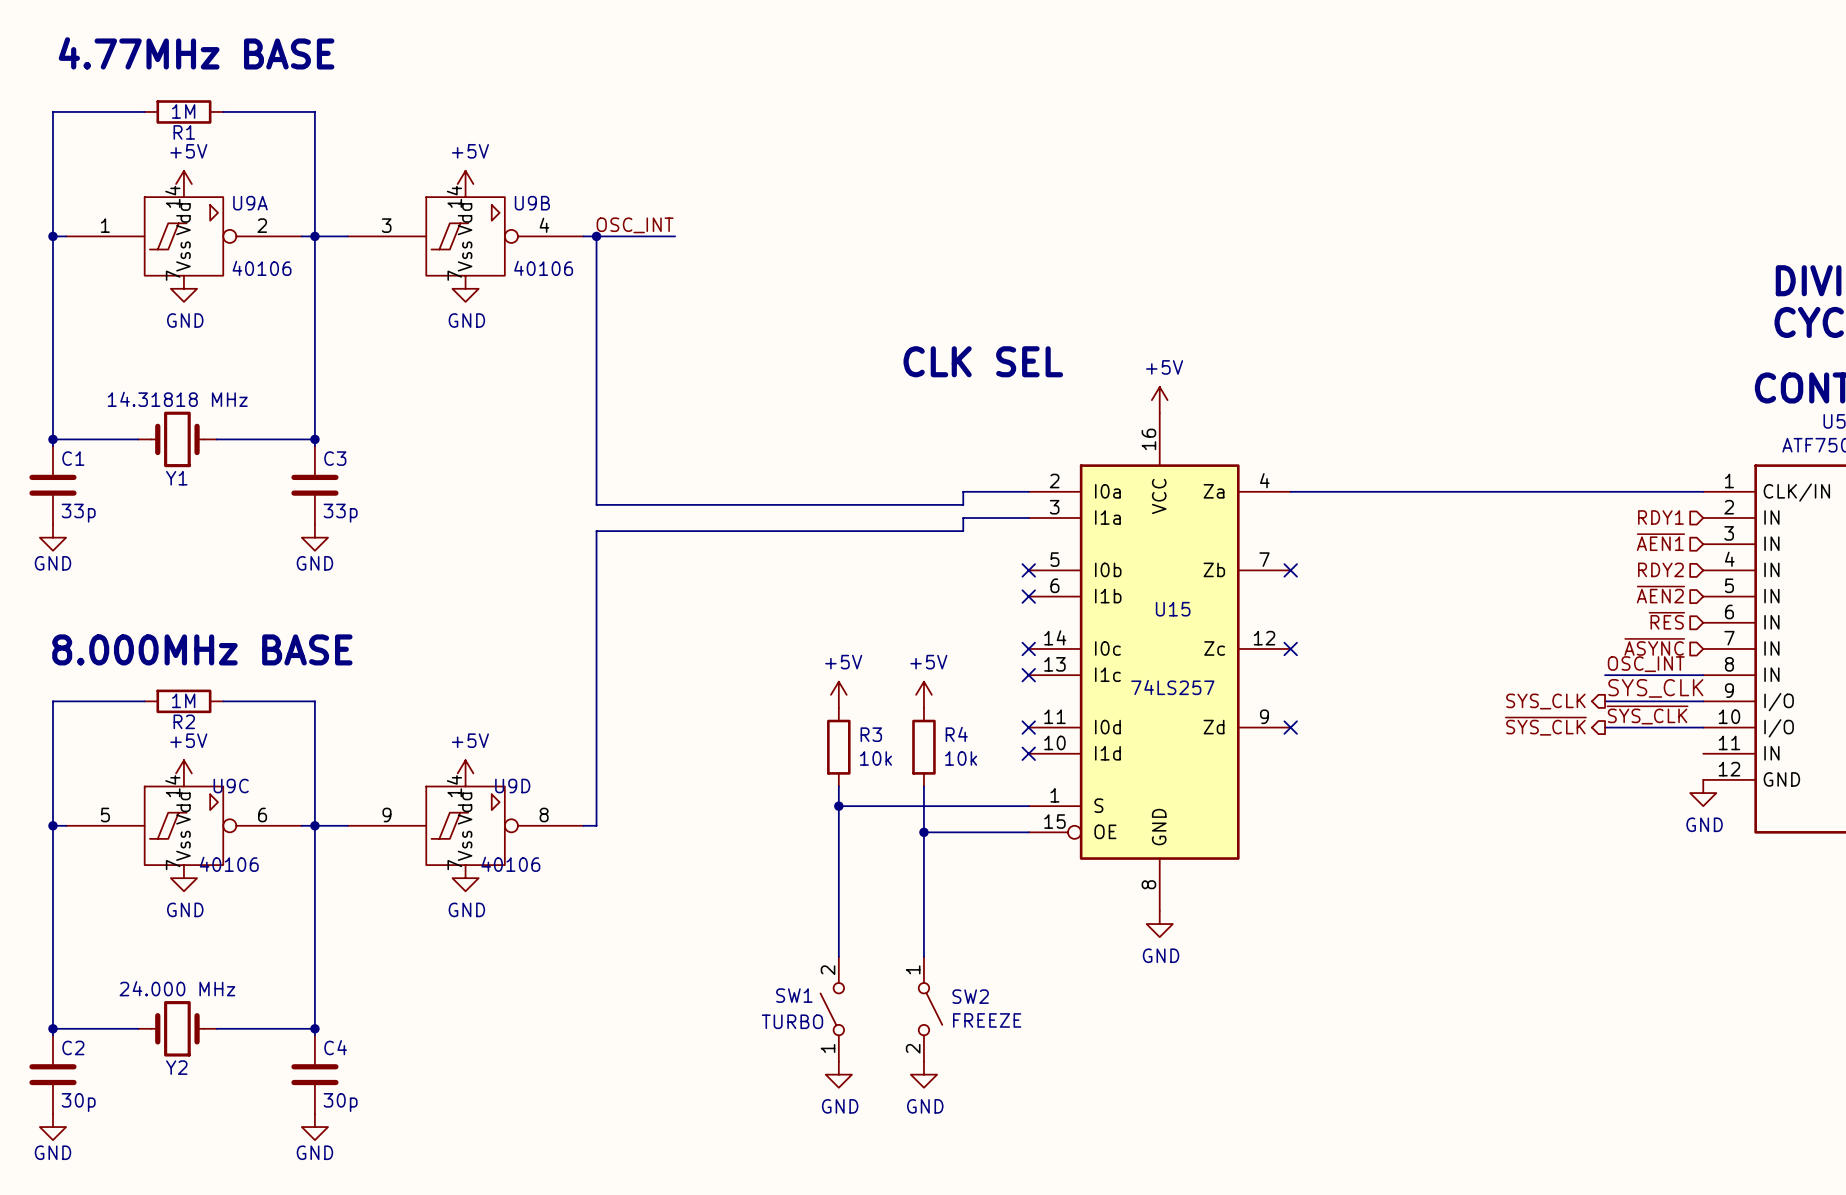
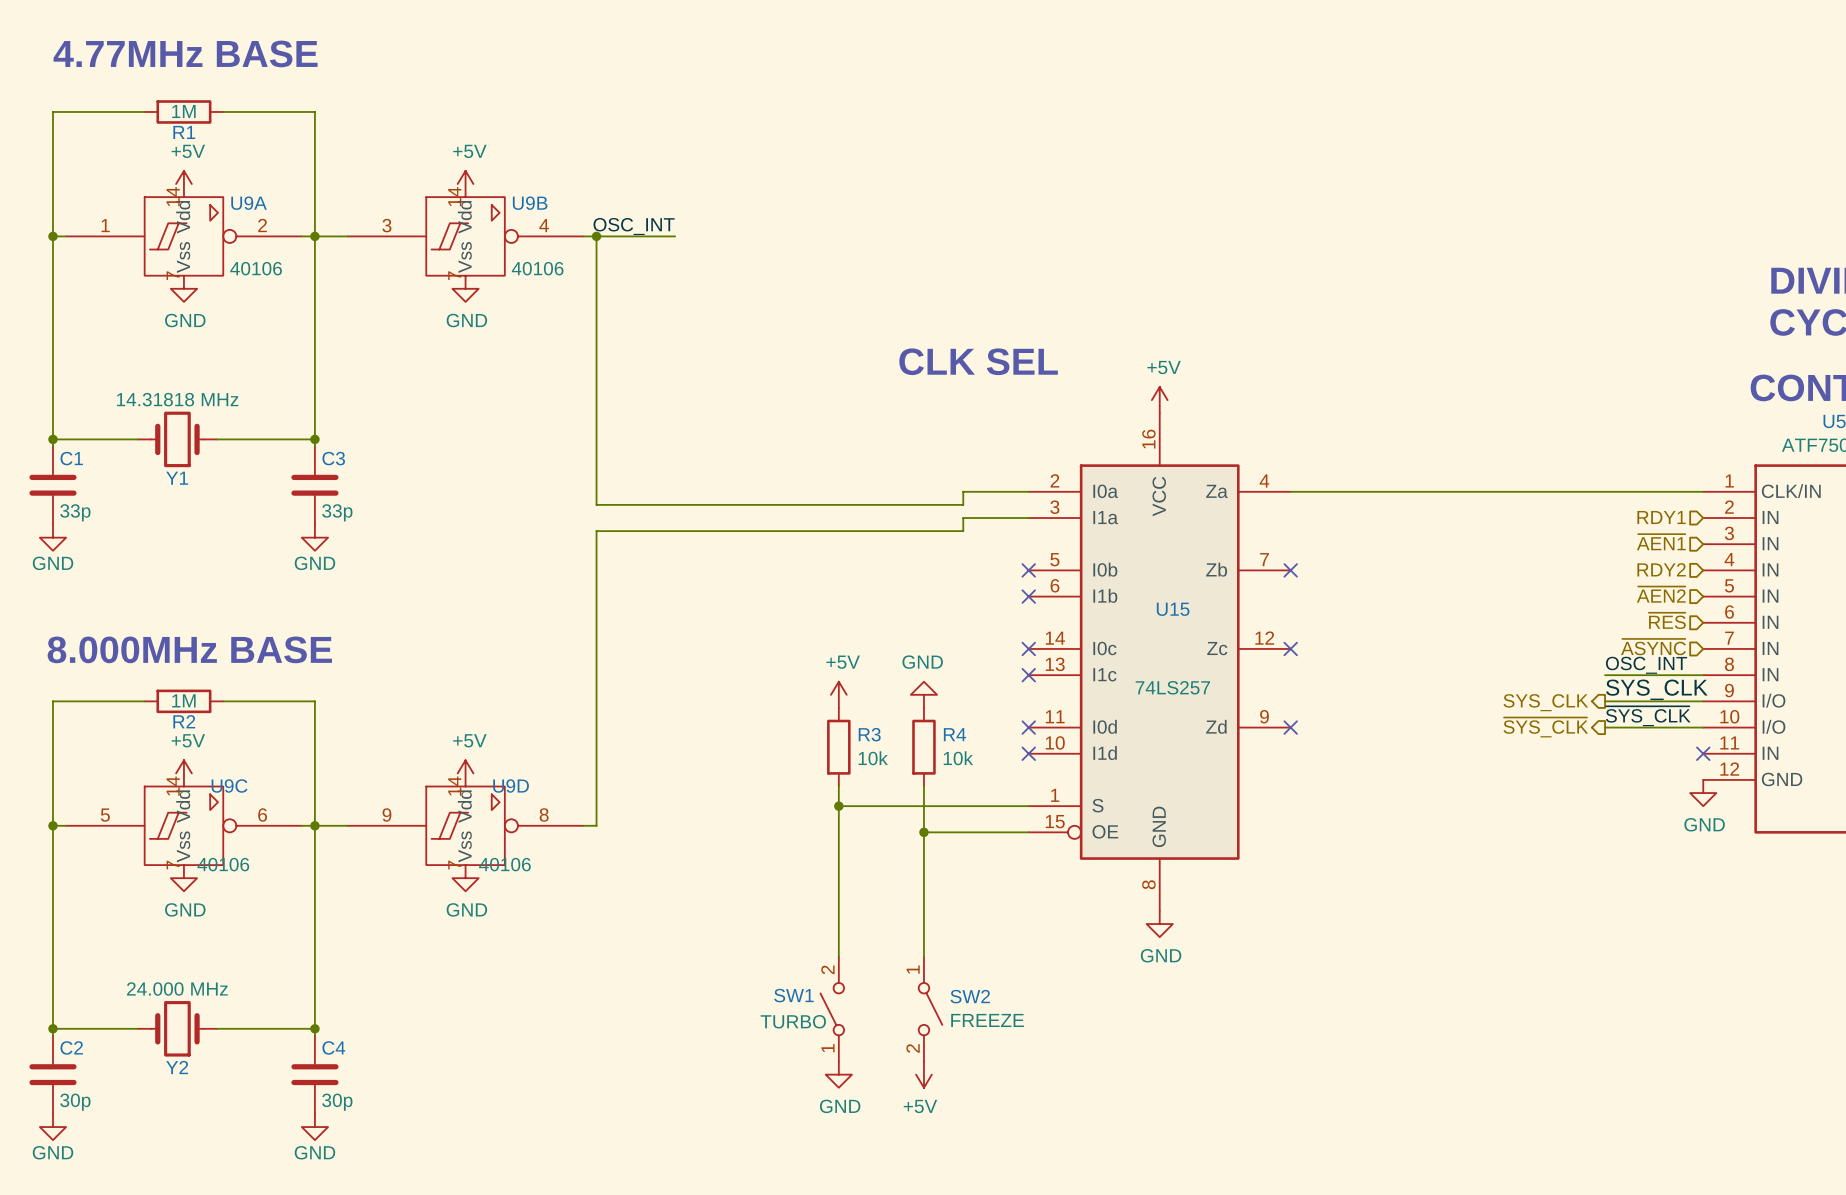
power symbol: +5V (923, 694) -> GND (923, 694)
no-connect mark: none -> (1703, 753)
power symbol: GND (923, 1074) -> +5V (923, 1074)

